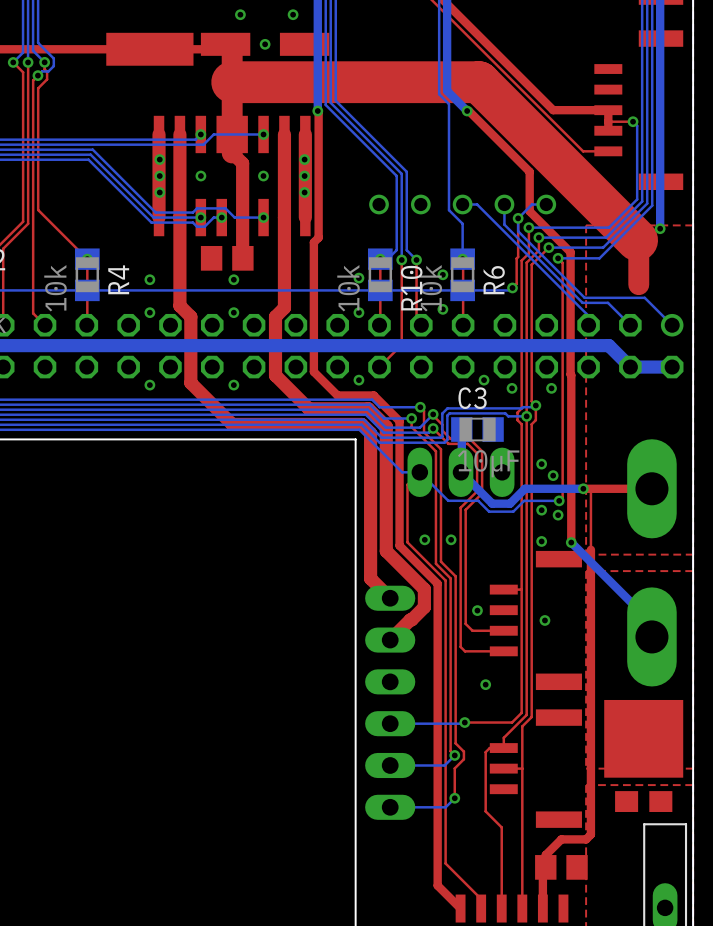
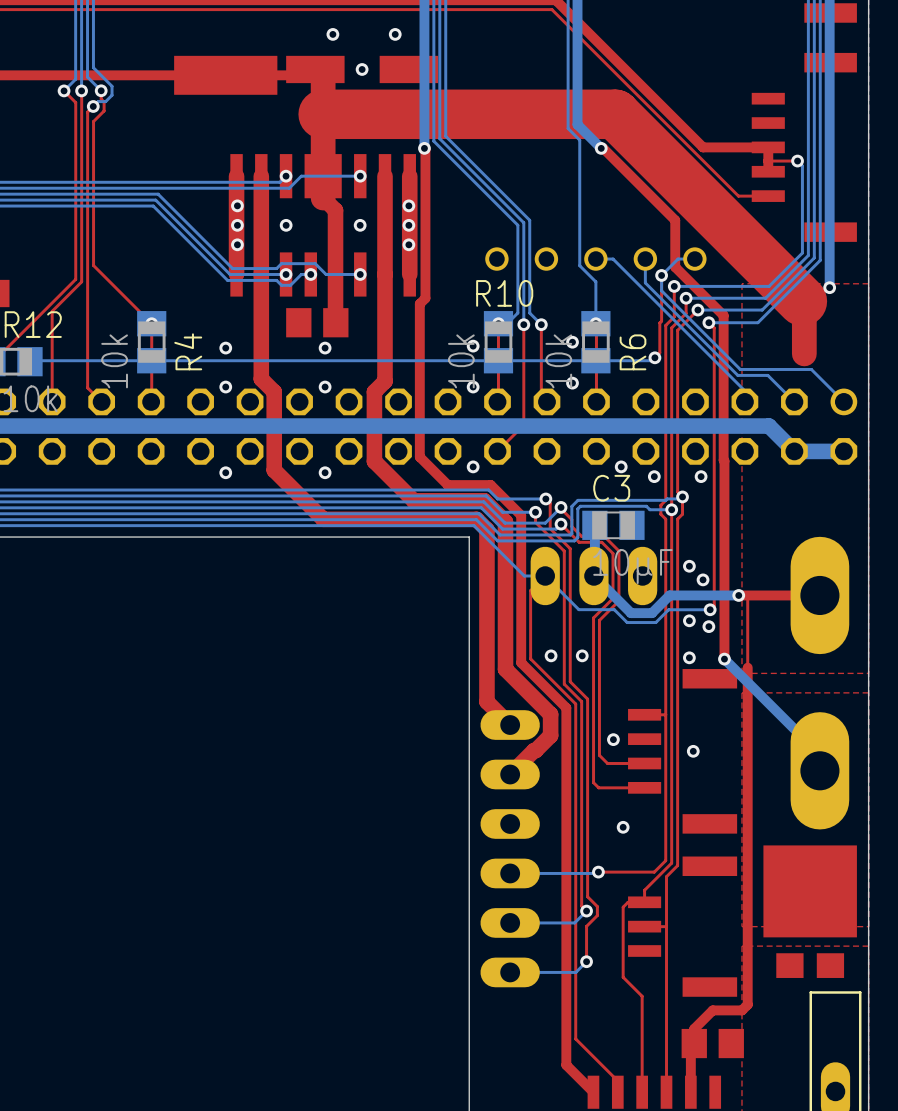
R10 name rotation: 0° (411, 288) -> 90° clockwise (504, 293)
R10 name position: R10 (411, 288) -> R10 (504, 293)

